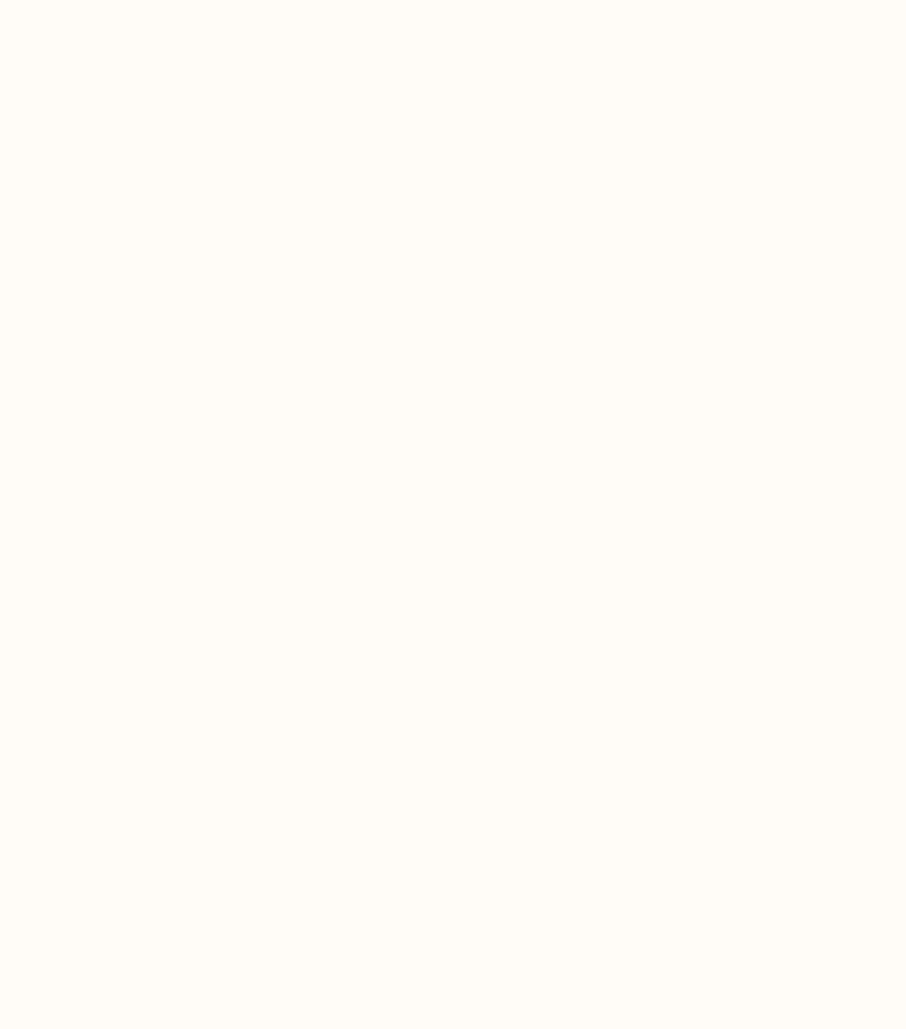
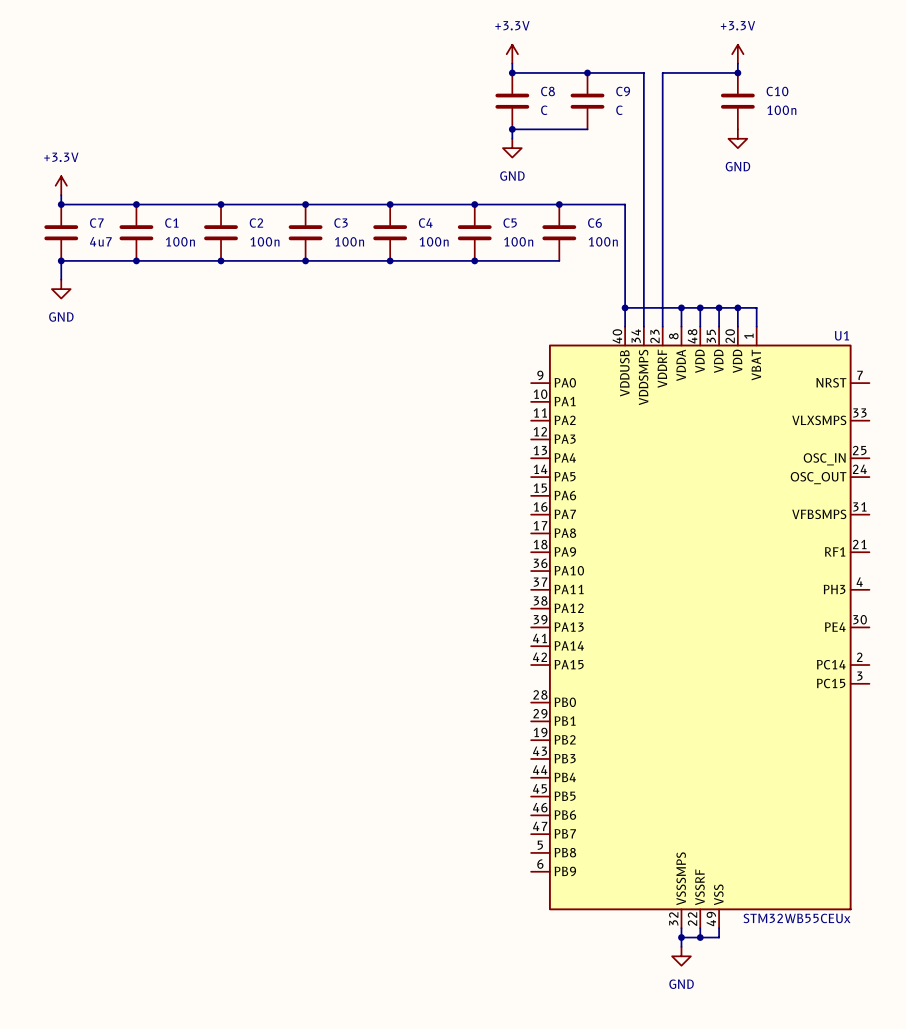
power symbol: none -> +3.3V (512, 54)
power symbol: none -> +3.3V (737, 54)
wire: none -> (512, 63) (512, 72) (643, 72) (643, 326)
wire: none -> (737, 63) (737, 72) (662, 72) (662, 326)
junction: none -> (512, 72)
junction: none -> (587, 72)
junction: none -> (737, 72)
C8: none -> C (512, 101)
C9: none -> C (587, 101)
C10: none -> 100n (737, 101)
junction: none -> (512, 129)
wire: none -> (587, 129) (512, 129) (512, 138)
power symbol: none -> GND (737, 138)
power symbol: none -> GND (512, 148)
power symbol: none -> +3.3V (61, 185)
wire: none -> (61, 195) (61, 204) (625, 204) (625, 326)
junction: none -> (61, 204)
junction: none -> (136, 204)
junction: none -> (221, 204)
junction: none -> (305, 204)
junction: none -> (390, 204)
junction: none -> (474, 204)
junction: none -> (559, 204)
C7: none -> 4u7 (61, 232)
C1: none -> 100n (136, 232)
C2: none -> 100n (221, 232)
C3: none -> 100n (305, 232)
C4: none -> 100n (390, 232)
C5: none -> 100n (474, 232)
C6: none -> 100n (559, 232)
junction: none -> (61, 260)
junction: none -> (136, 260)
junction: none -> (221, 260)
junction: none -> (305, 260)
junction: none -> (390, 260)
junction: none -> (474, 260)
wire: none -> (559, 260) (61, 260) (61, 279)
power symbol: none -> GND (61, 289)
wire: none -> (625, 307) (756, 307) (756, 326)
junction: none -> (625, 307)
wire: none -> (681, 307) (681, 326)
junction: none -> (681, 307)
wire: none -> (700, 307) (700, 326)
junction: none -> (700, 307)
wire: none -> (719, 307) (719, 326)
junction: none -> (719, 307)
wire: none -> (737, 307) (737, 326)
junction: none -> (737, 307)
U1: none -> STM32WB55CEUx (700, 627)
wire: none -> (681, 928) (681, 946)
wire: none -> (700, 928) (700, 937)
wire: none -> (719, 928) (719, 937) (681, 937)
junction: none -> (681, 937)
junction: none -> (700, 937)
power symbol: none -> GND (681, 956)

